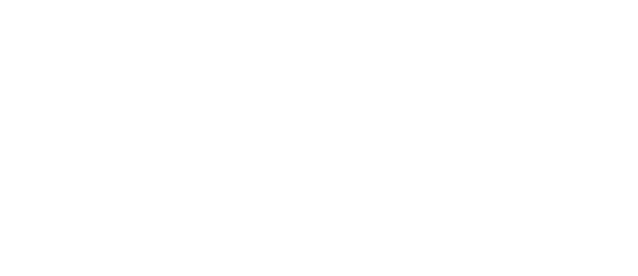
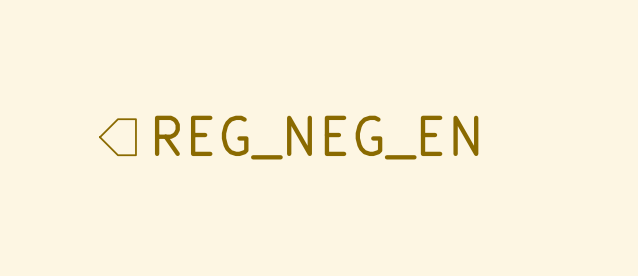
hierarchical label: none -> REG_NEG_EN (316, 137)

